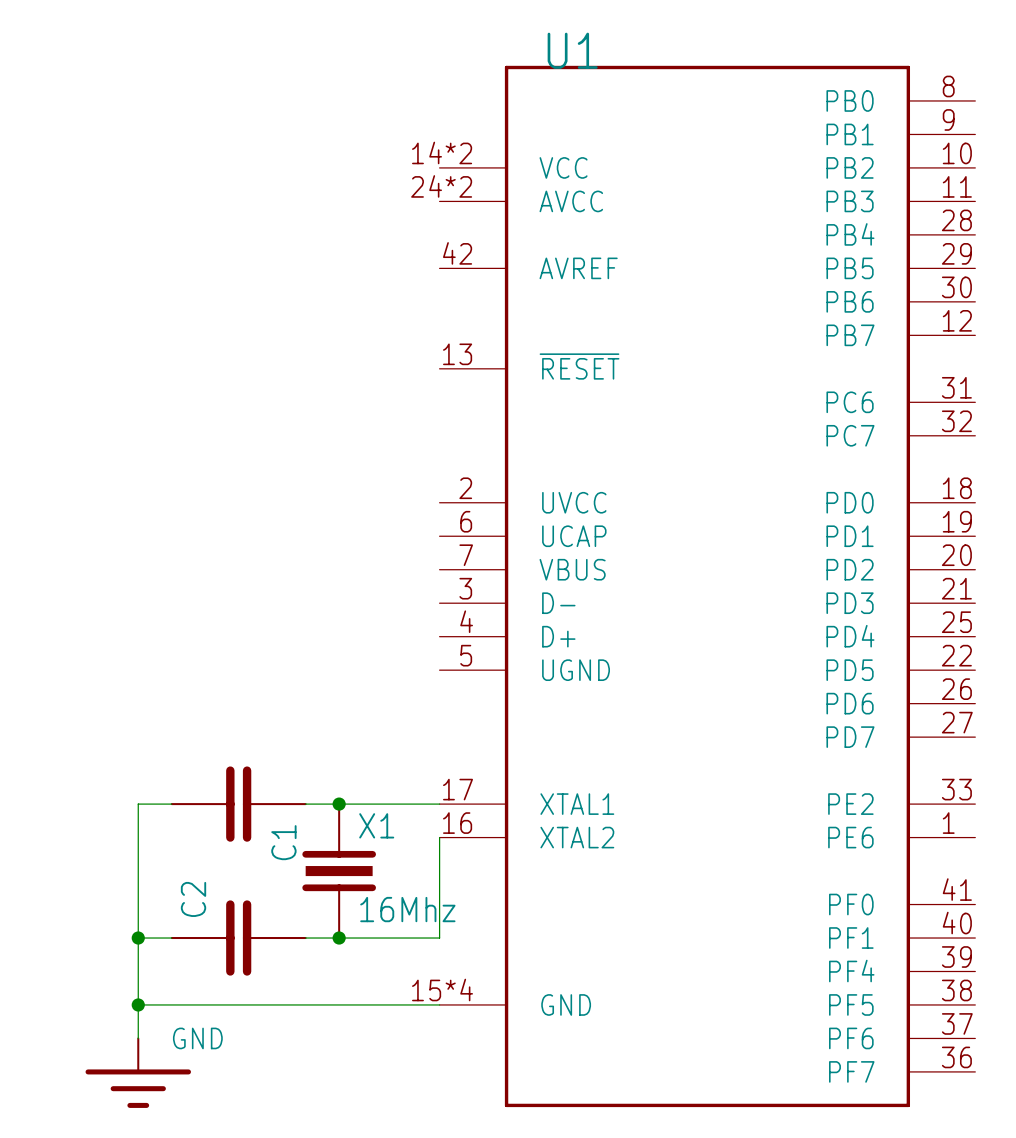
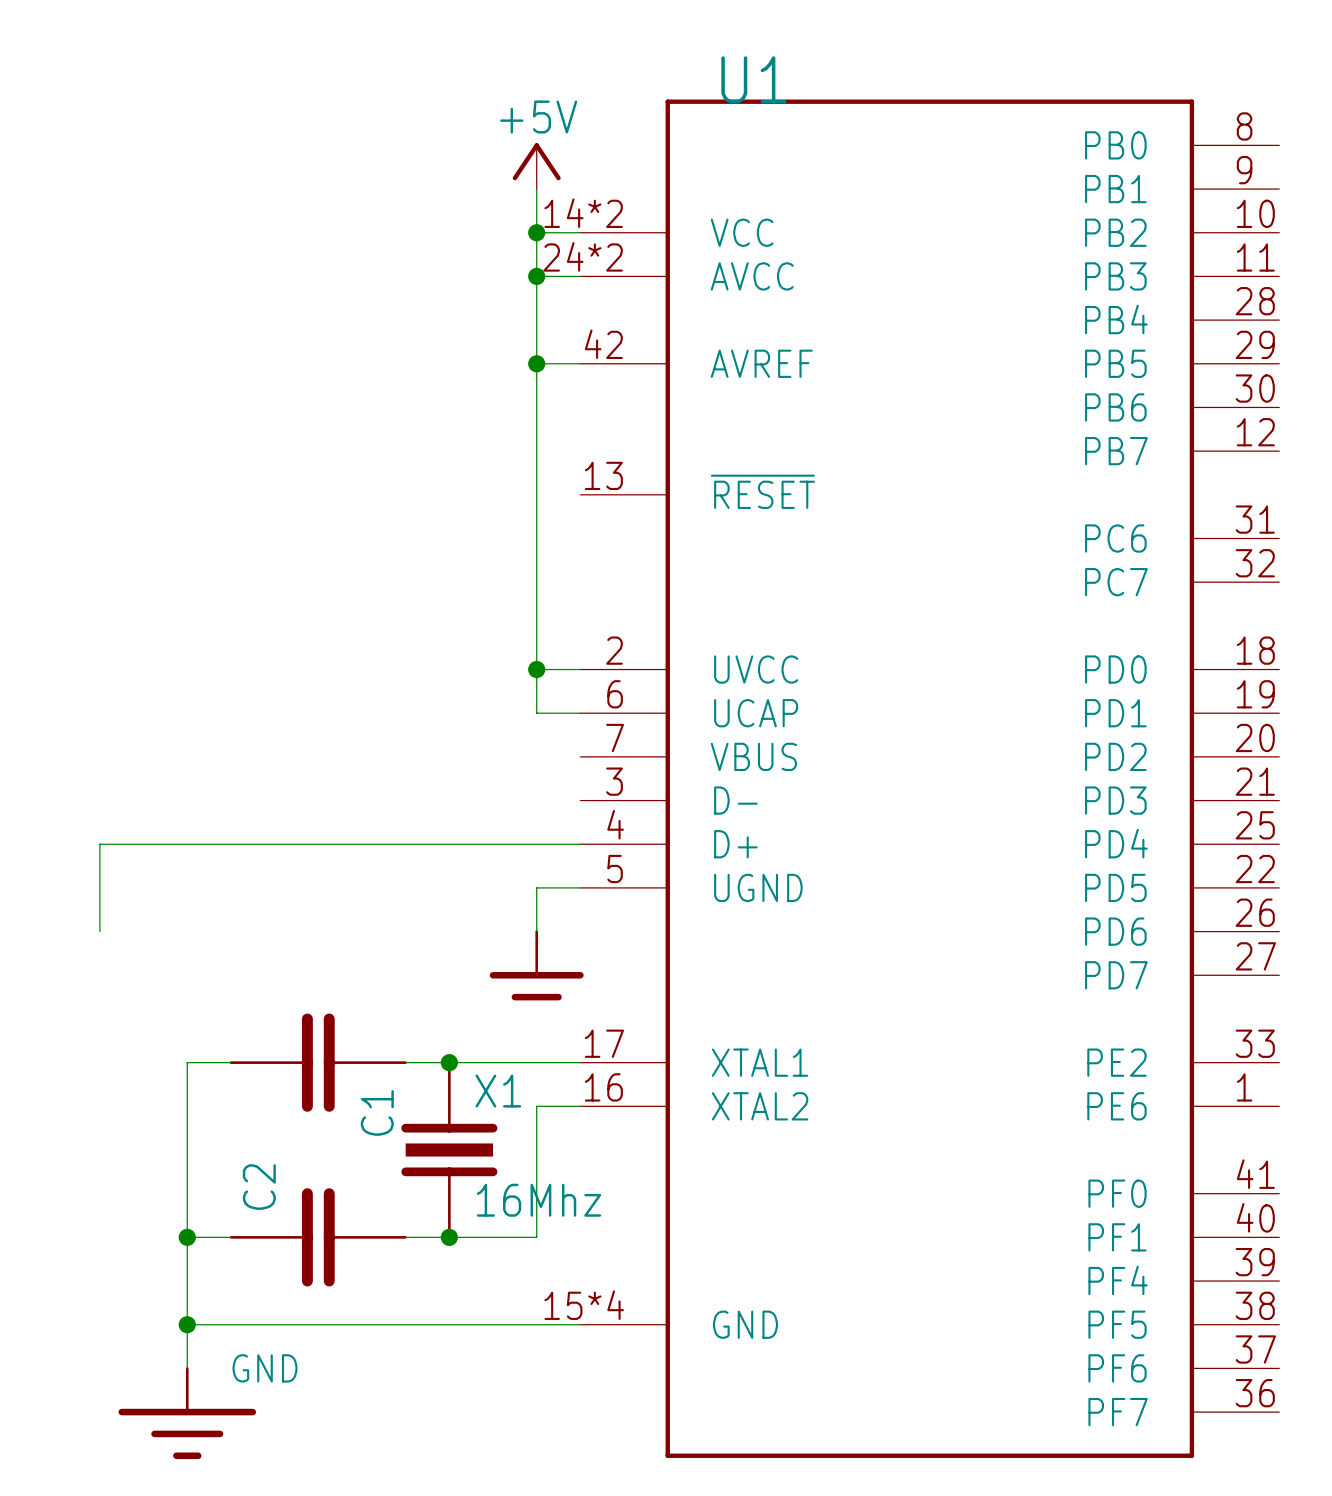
power symbol: none -> +5V (536, 166)
wire: none -> (536, 189) (536, 713) (580, 713)
wire: none -> (536, 232) (580, 232)
junction: none -> (536, 232)
wire: none -> (536, 276) (580, 276)
junction: none -> (536, 276)
wire: none -> (536, 363) (580, 363)
junction: none -> (536, 363)
wire: none -> (536, 669) (580, 669)
junction: none -> (536, 669)
wire: none -> (580, 844) (99, 844) (99, 931)
wire: none -> (580, 887) (536, 887) (536, 931)
power symbol: none -> (536, 965)
wire: (439, 837) (439, 938) (406, 938) -> (580, 1106) (536, 1106) (536, 1237)

